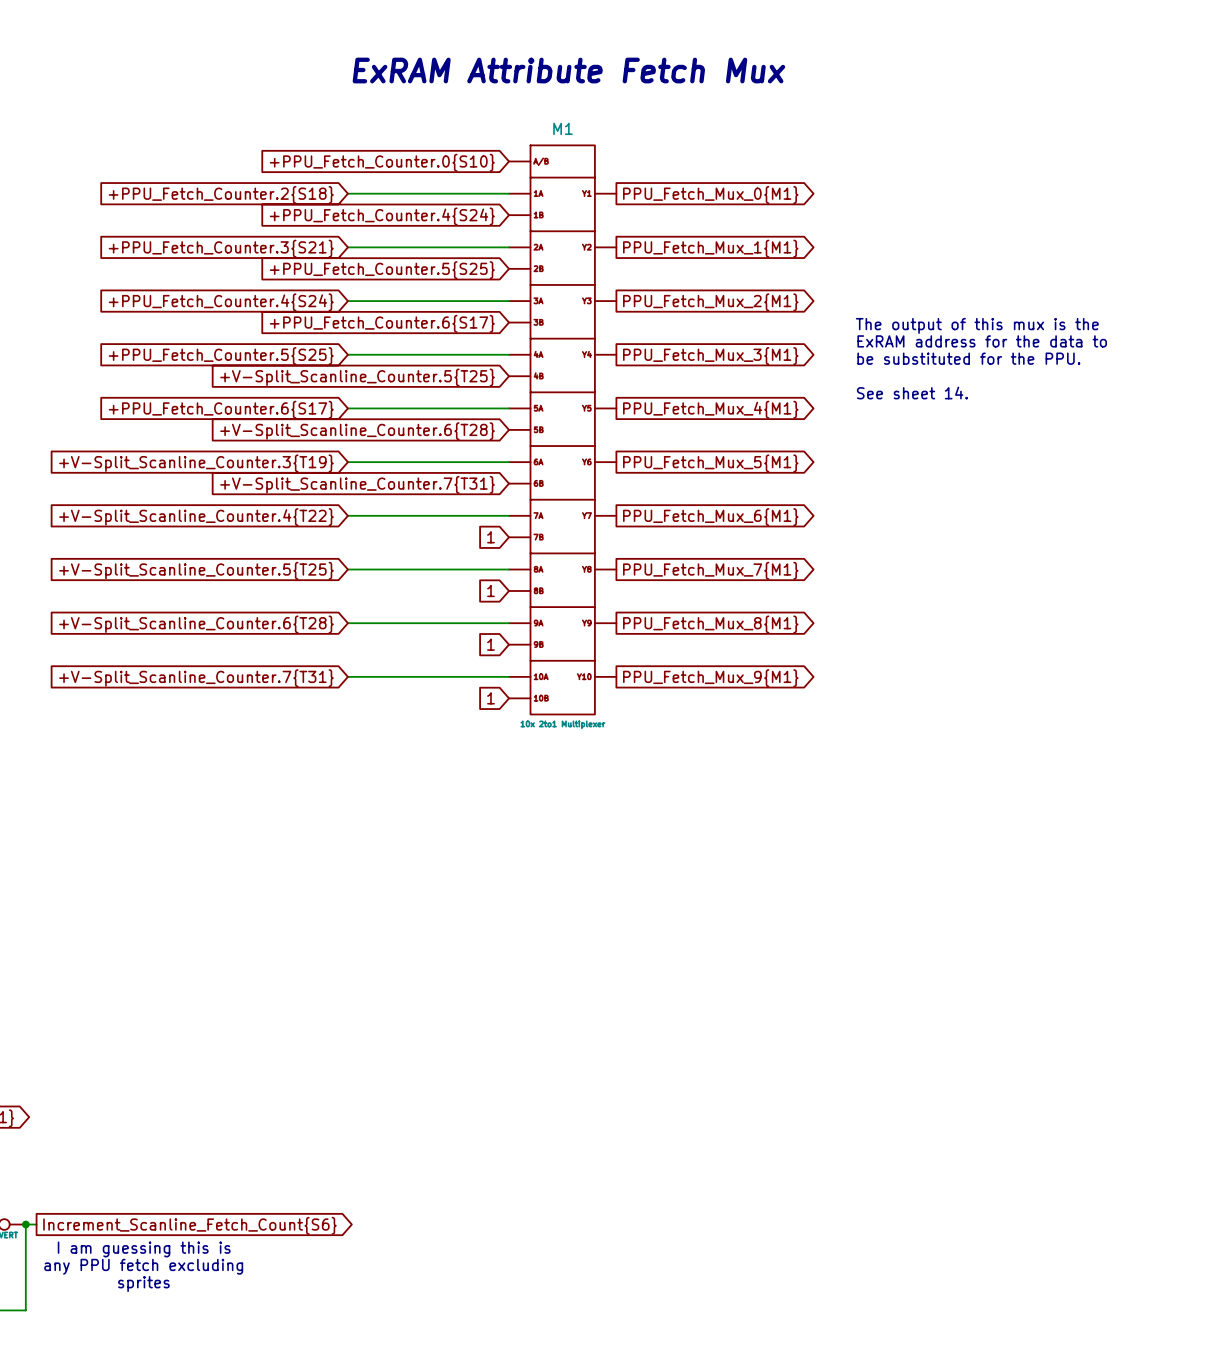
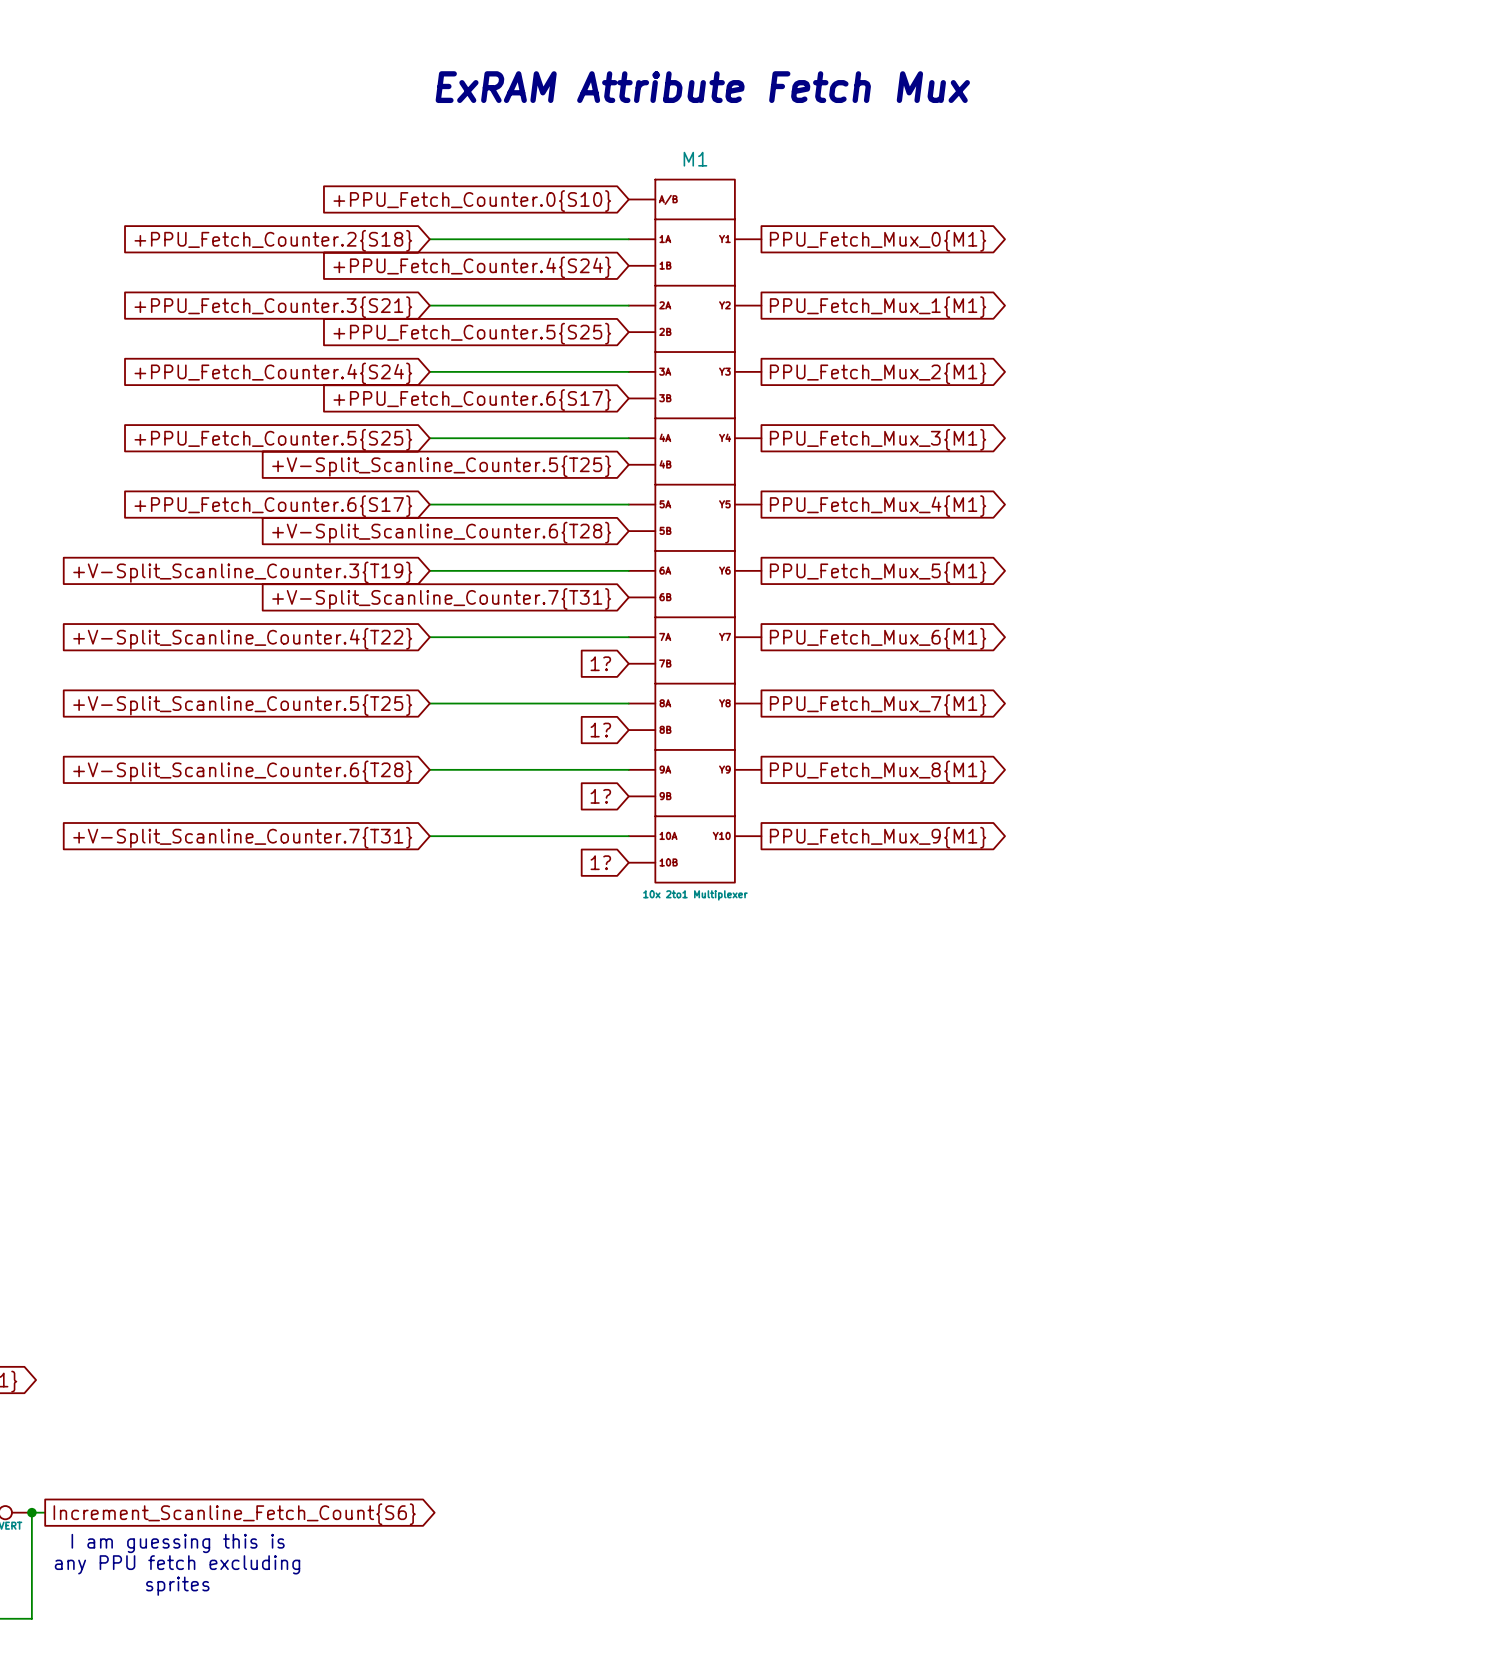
text: The output of this mux is the (977, 325) -> none
text: ExRAM address for the data to (982, 341) -> none
text: be substituted for the PPU. (968, 358) -> none
text: See sheet 14. (912, 393) -> none
global label: 1 (490, 537) -> 1? (600, 663)
global label: 1 (490, 590) -> 1? (600, 730)
global label: 1 (490, 644) -> 1? (600, 796)
global label: 1 (490, 698) -> 1? (600, 862)

